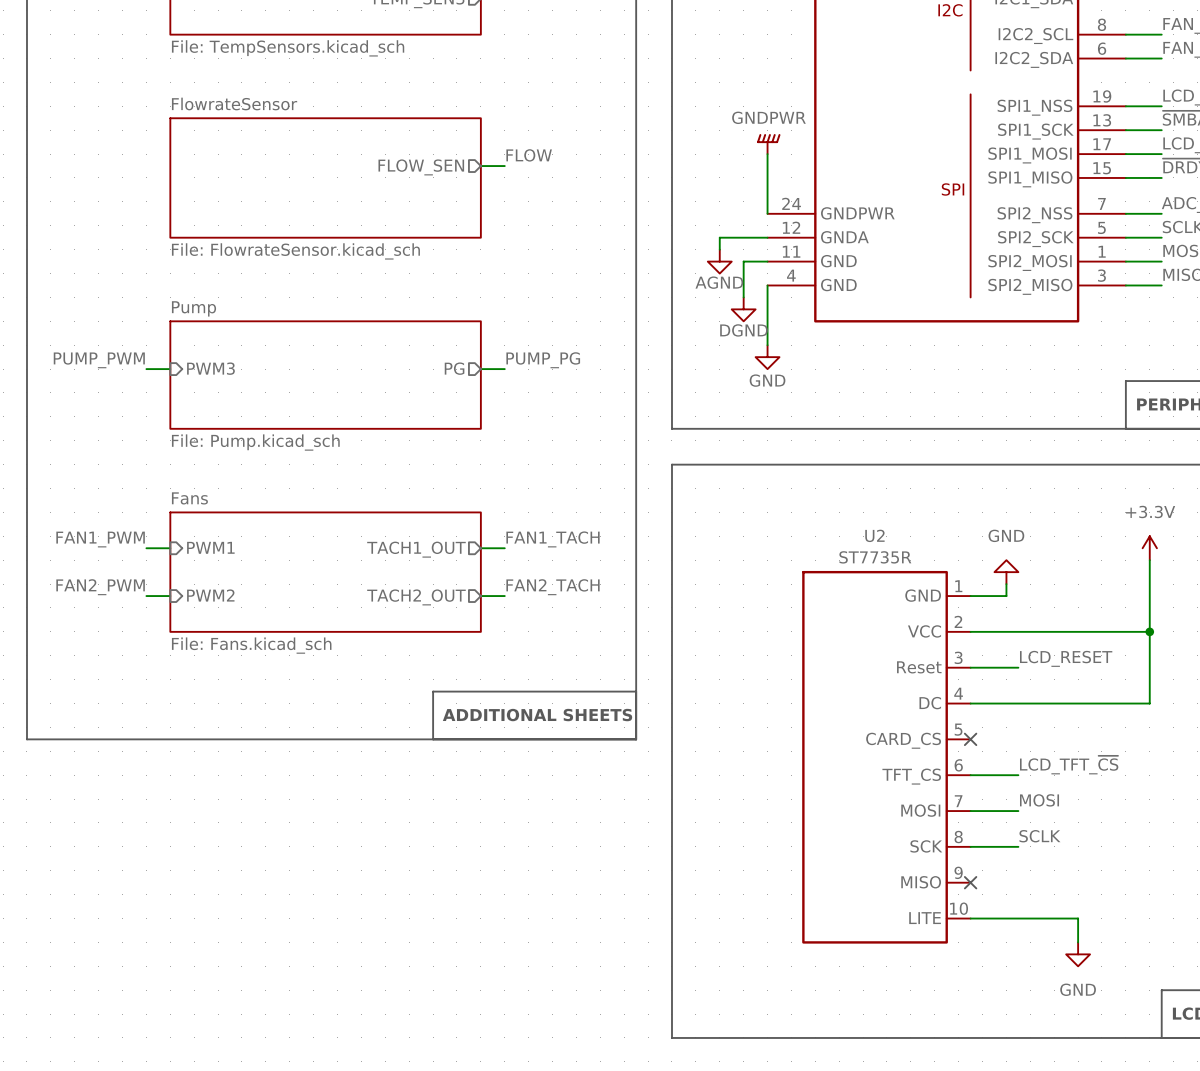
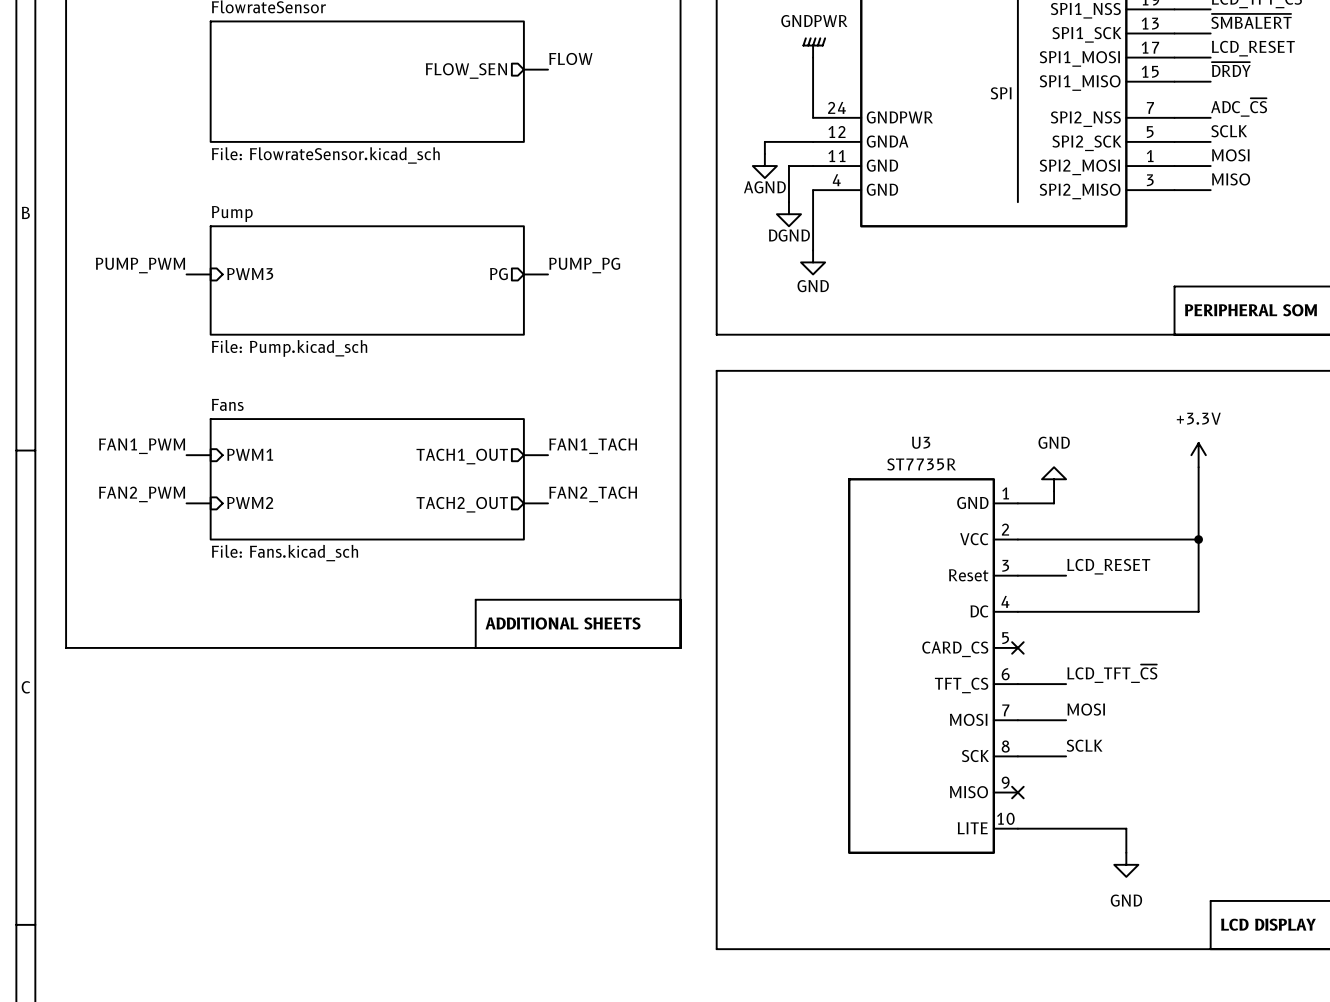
U2 name: U2 (874, 535) -> U3 (921, 442)

